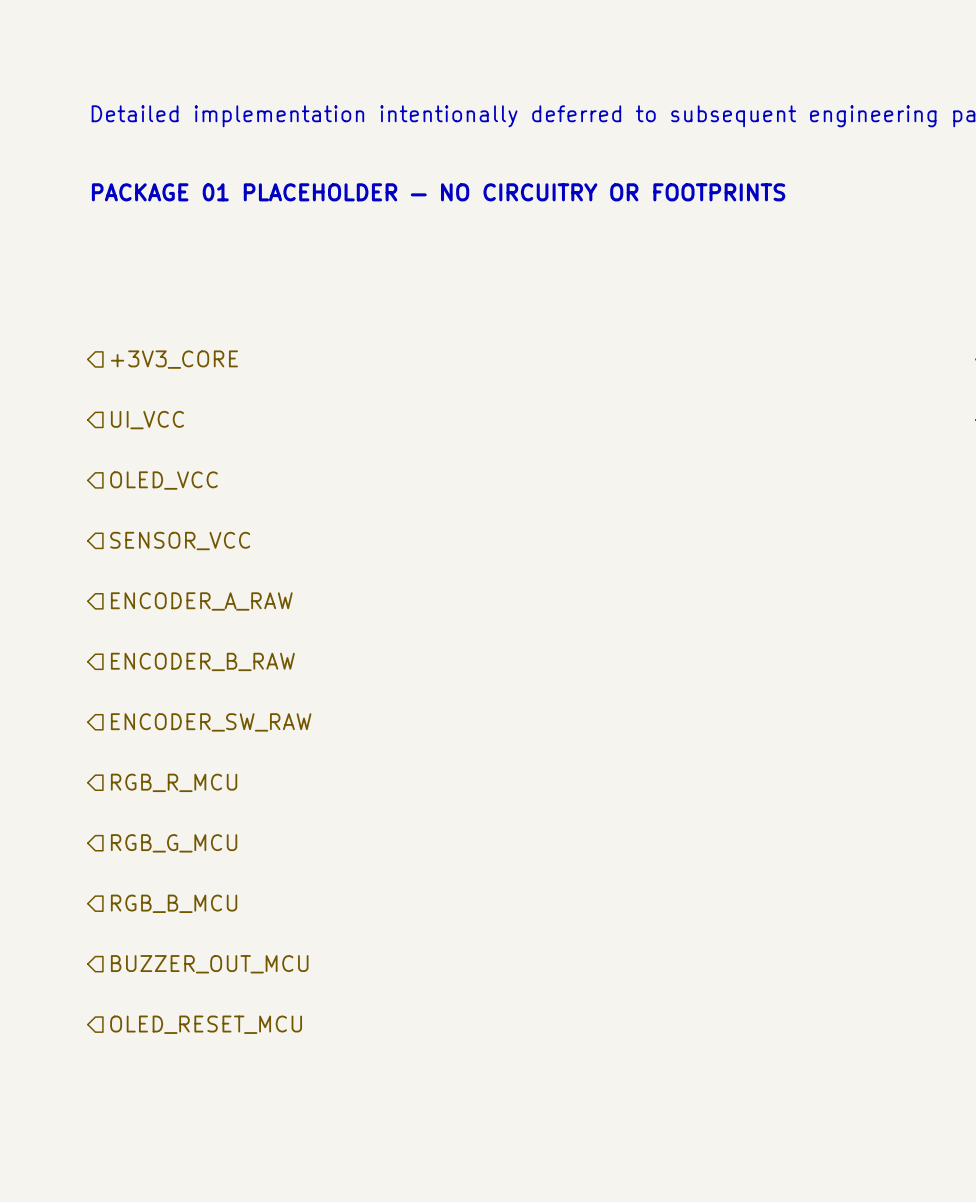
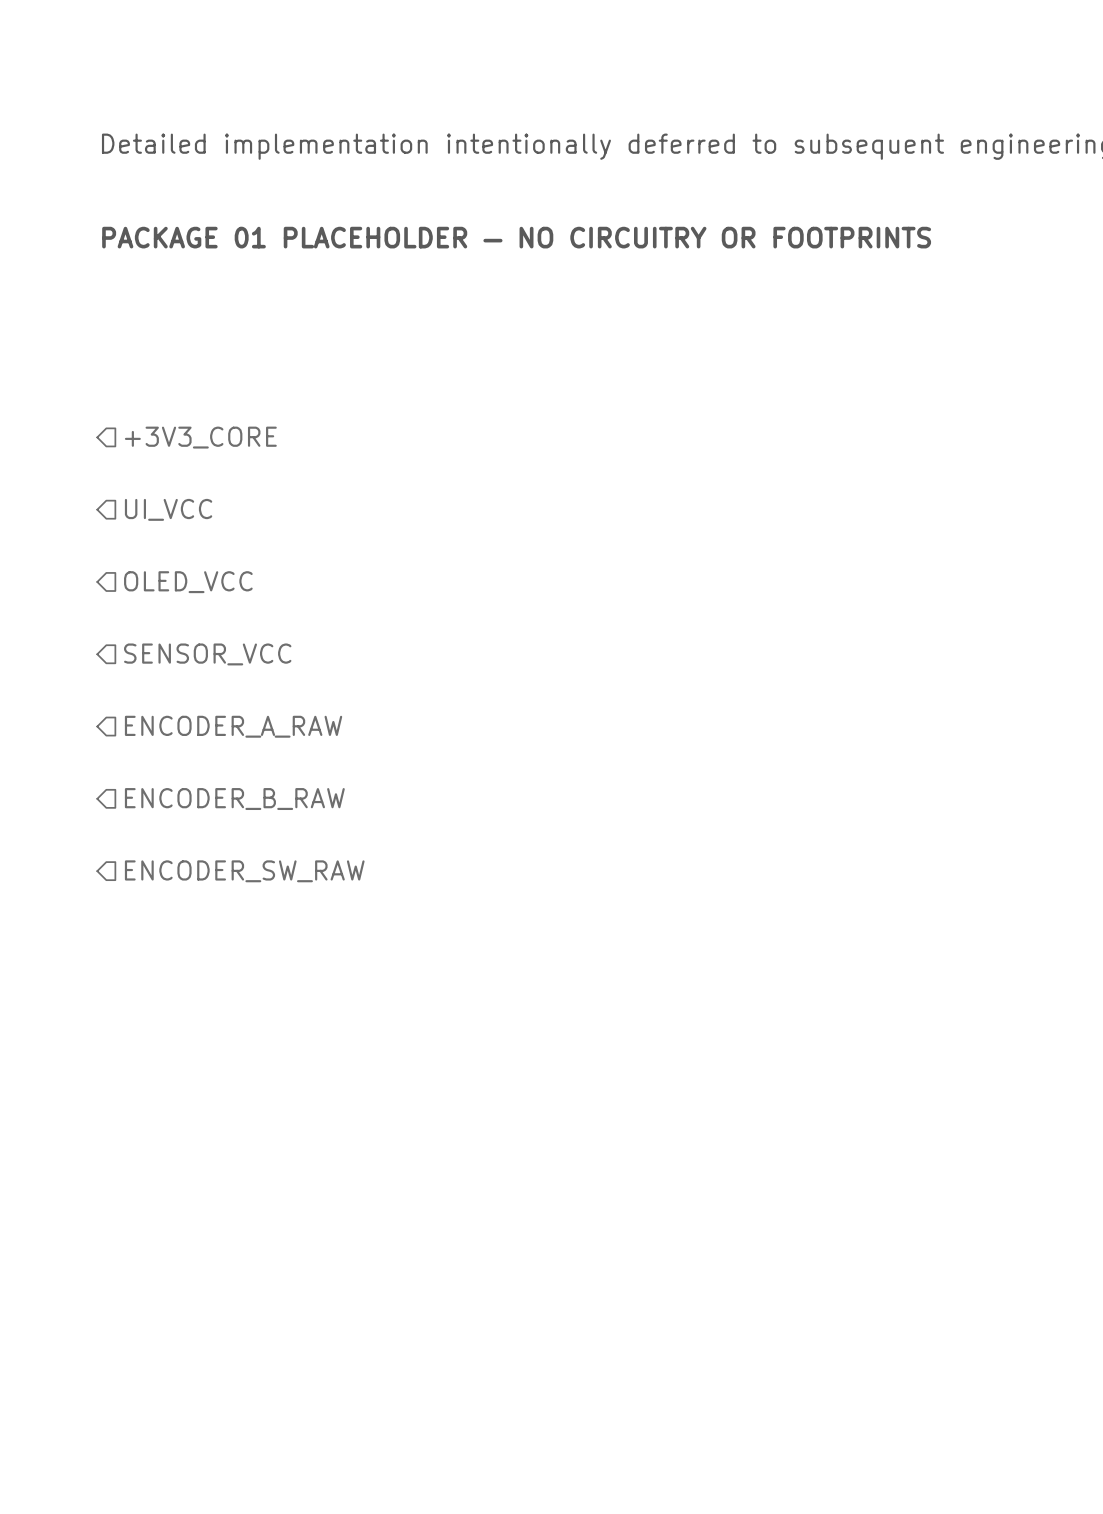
hierarchical label: RGB_R_MCU (174, 782) -> none
hierarchical label: RGB_G_MCU (174, 843) -> none
hierarchical label: RGB_B_MCU (174, 903) -> none
hierarchical label: BUZZER_OUT_MCU (209, 964) -> none
hierarchical label: OLED_RESET_MCU (206, 1024) -> none

